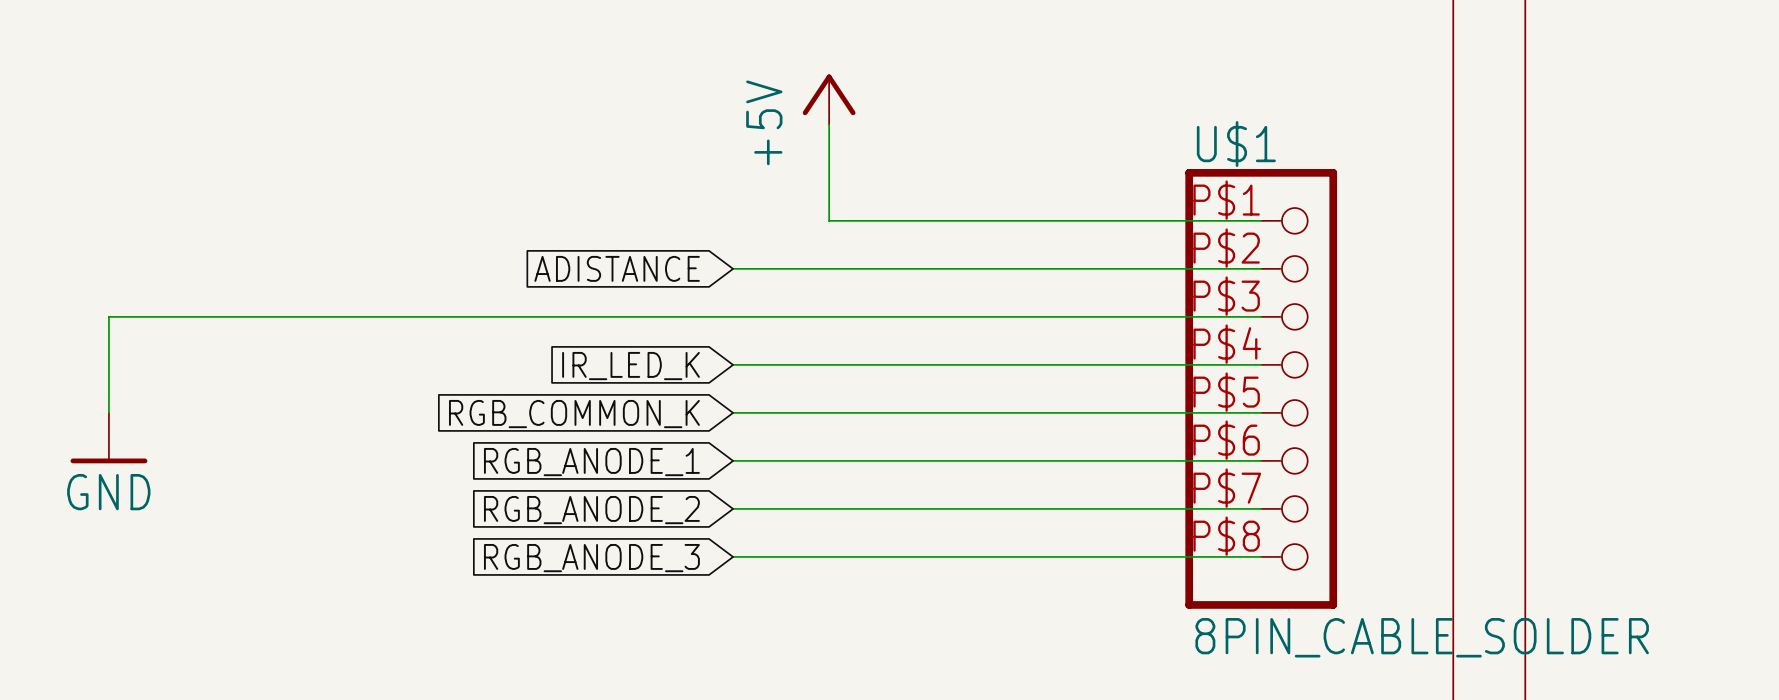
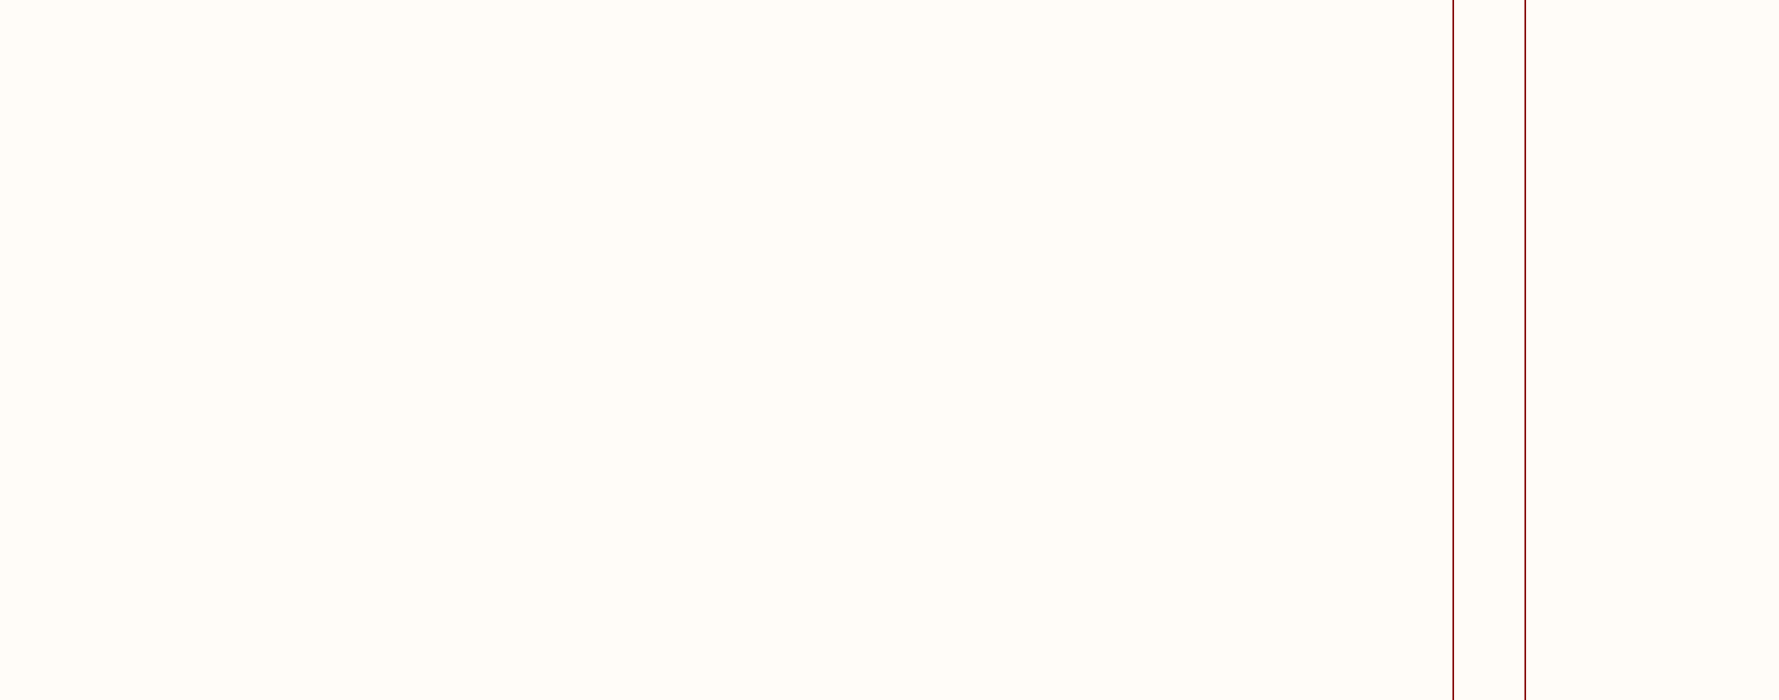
power symbol: +5V (829, 99) -> none
wire: (829, 124) (829, 220) (1261, 220) -> none
global label: ADISTANCE (617, 268) -> none
wire: (733, 268) (1261, 268) -> none
wire: (1261, 316) (108, 316) (108, 412) -> none
wire: (733, 364) (1261, 364) -> none
global label: IR_LED_K (631, 366) -> none
U$1: 8PIN_CABLE_SOLDER (1261, 388) -> none
wire: (733, 412) (1261, 412) -> none
global label: RGB_COMMON_K (574, 414) -> none
power symbol: GND (108, 438) -> none
wire: (733, 460) (1261, 460) -> none
global label: RGB_ANODE_1 (591, 462) -> none
wire: (733, 508) (1261, 508) -> none
global label: RGB_ANODE_2 (591, 510) -> none
wire: (733, 556) (1261, 556) -> none
global label: RGB_ANODE_3 (591, 558) -> none

